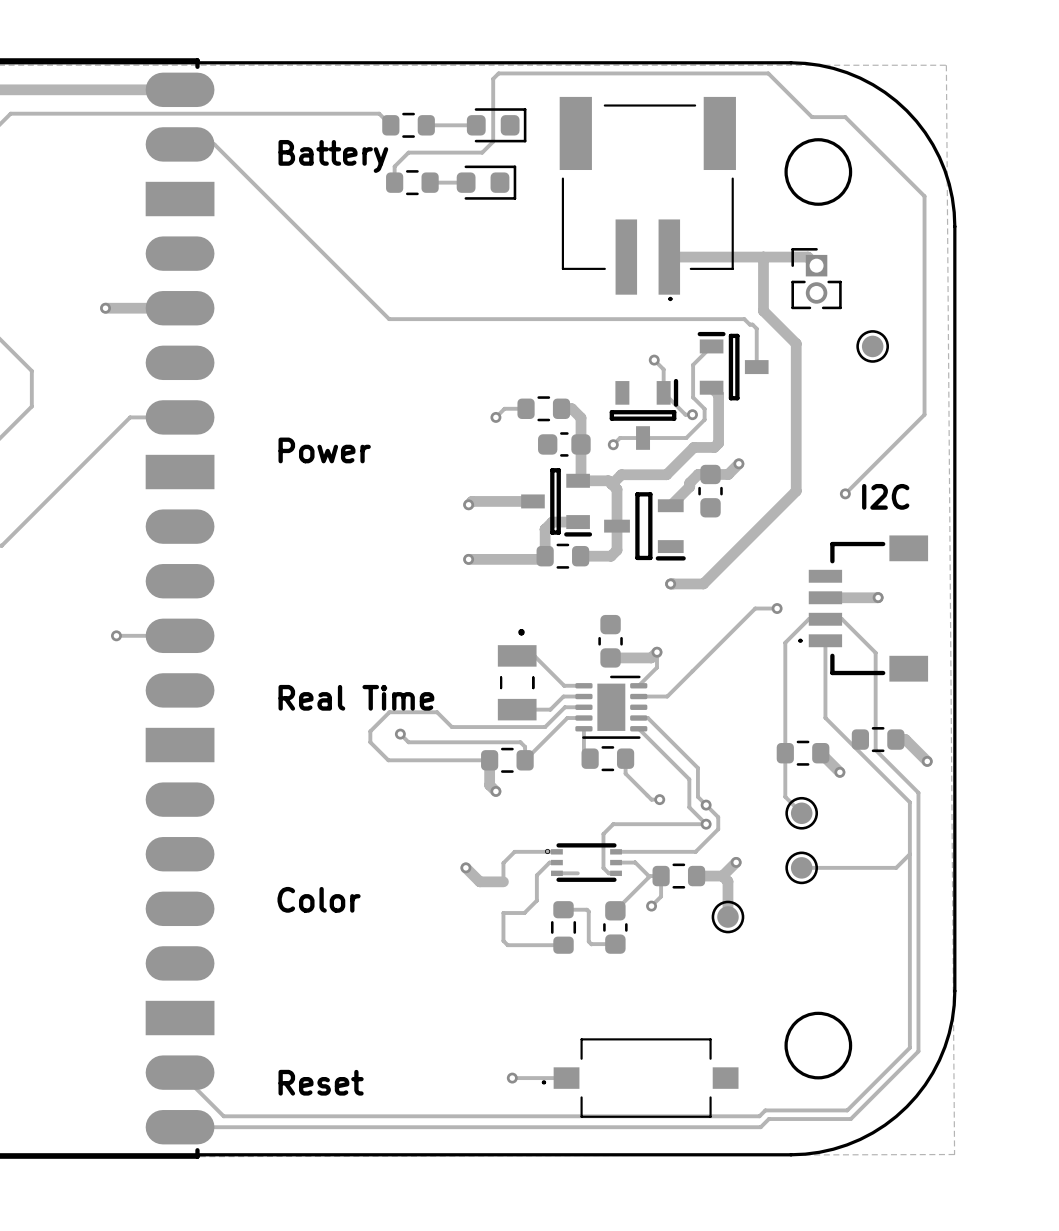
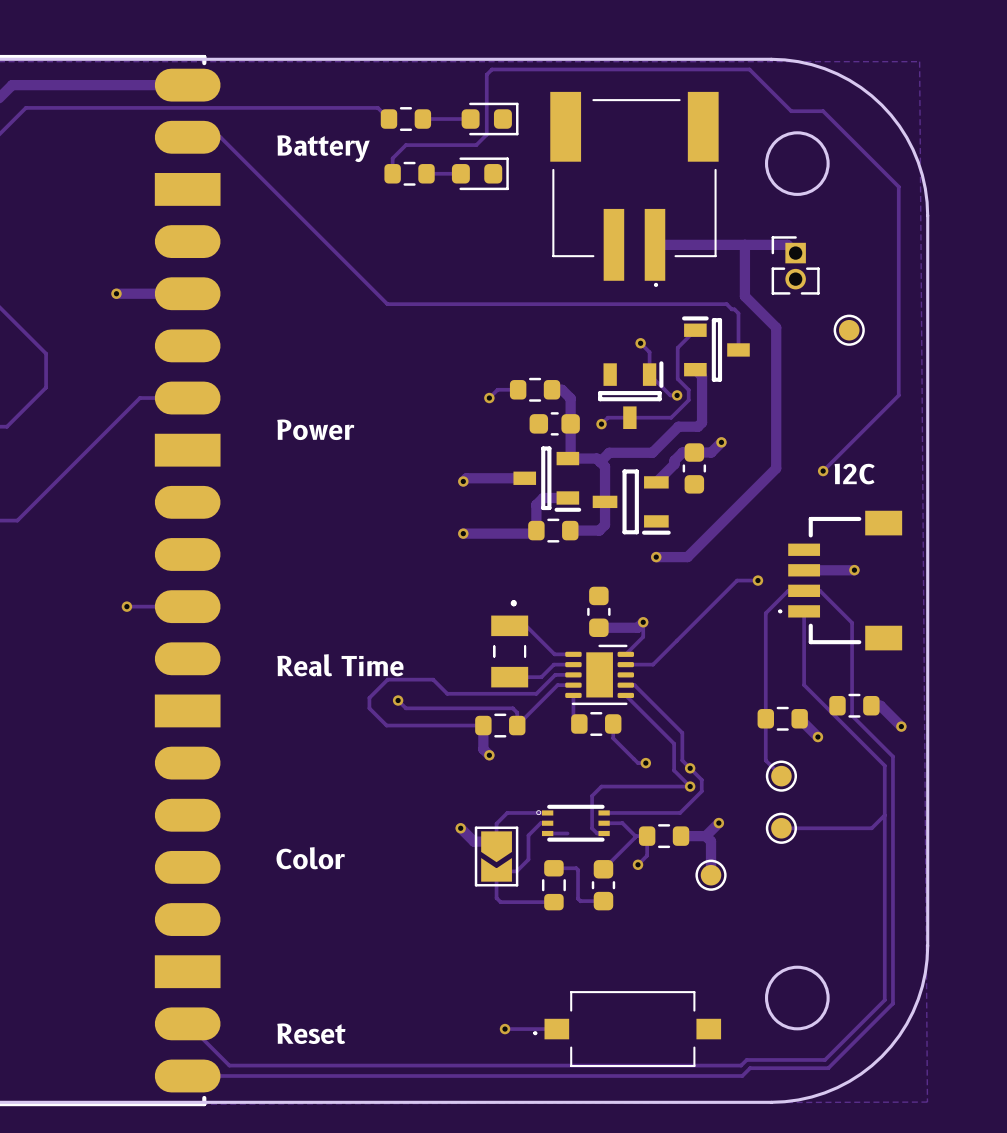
part: none -> (496, 856)

